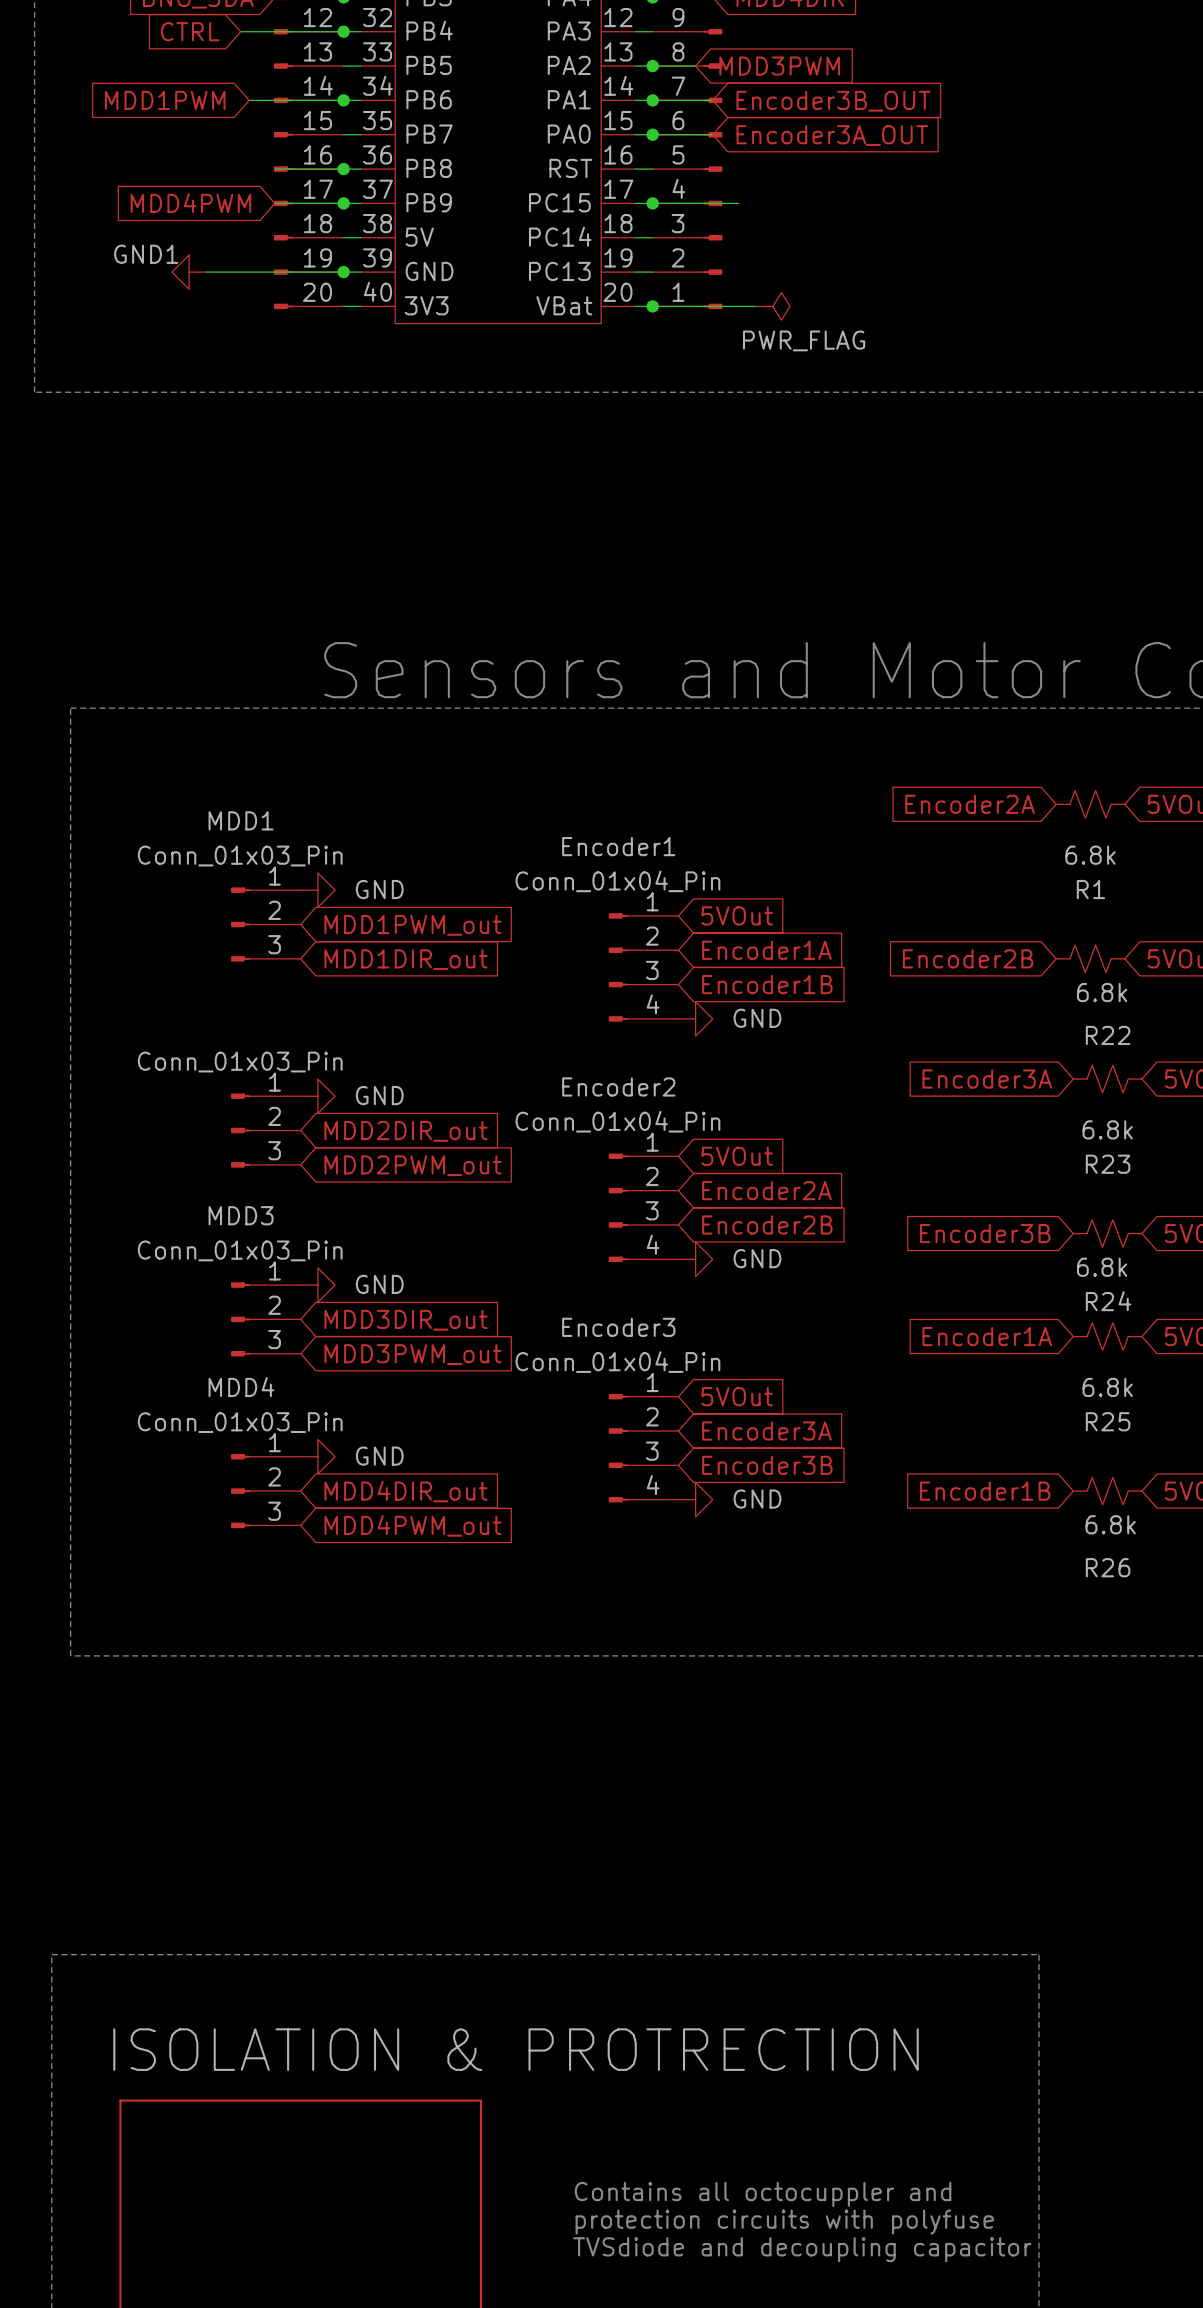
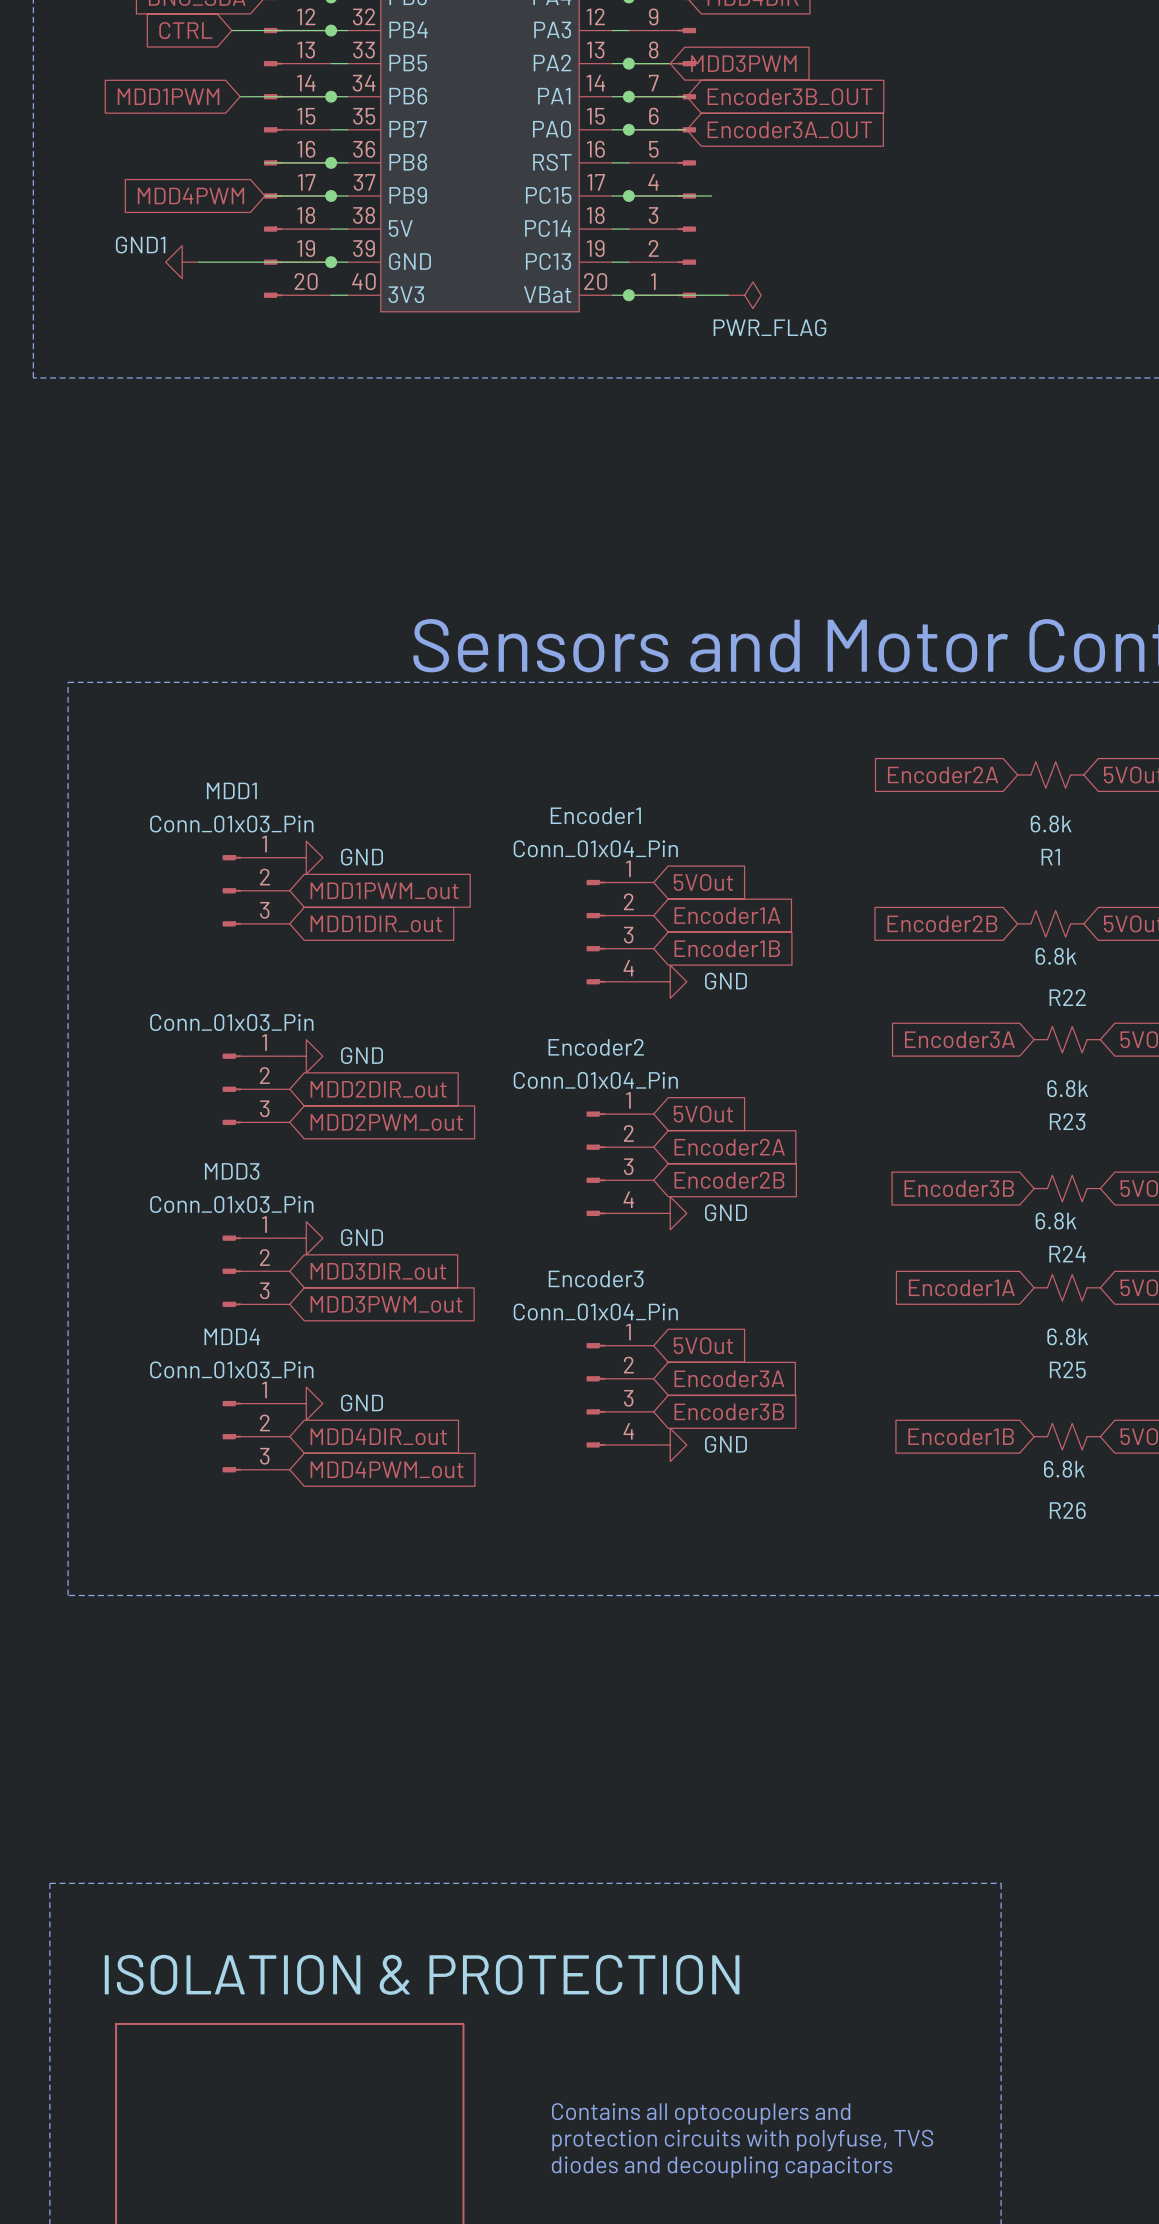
sheet ISOLATION & PROTRECTION name: ISOLATION & PROTRECTION (516, 2049) -> ISOLATION & PROTECTION (422, 1974)
text: Contains all octocuppler and (763, 2194) -> Contains all optocouplers and (701, 2113)
text: protection circuits with polyfuse (784, 2222) -> protection circuits with polyfuse, TVS (742, 2140)
text: TVSdiode and decoupling capacitor (802, 2249) -> diodes and decoupling capacitors (722, 2167)

